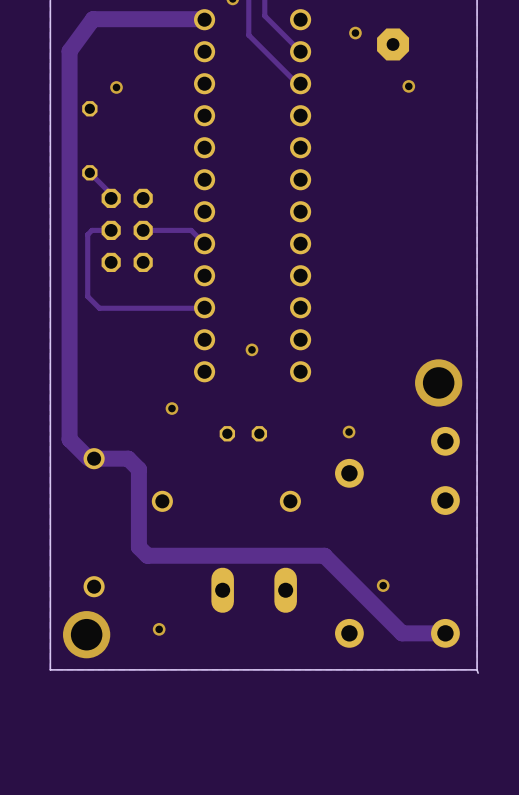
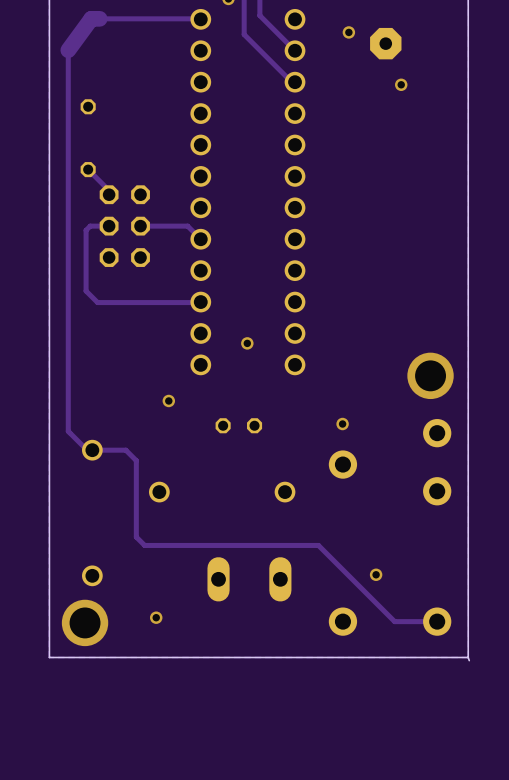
track width: thick (204, 19) (101, 19) -> thin (200, 18) (99, 18)
track width: thick (69, 51) (69, 439) (88, 458) -> thin (68, 50) (68, 431) (87, 450)
via: (116, 87) -> none
track width: thick (94, 458) (128, 458) (138, 469) (138, 547) (147, 555) (324, 555) (402, 633) (445, 633) -> thin (92, 450) (125, 450) (136, 460) (136, 537) (144, 545) (318, 545) (394, 621) (437, 621)

